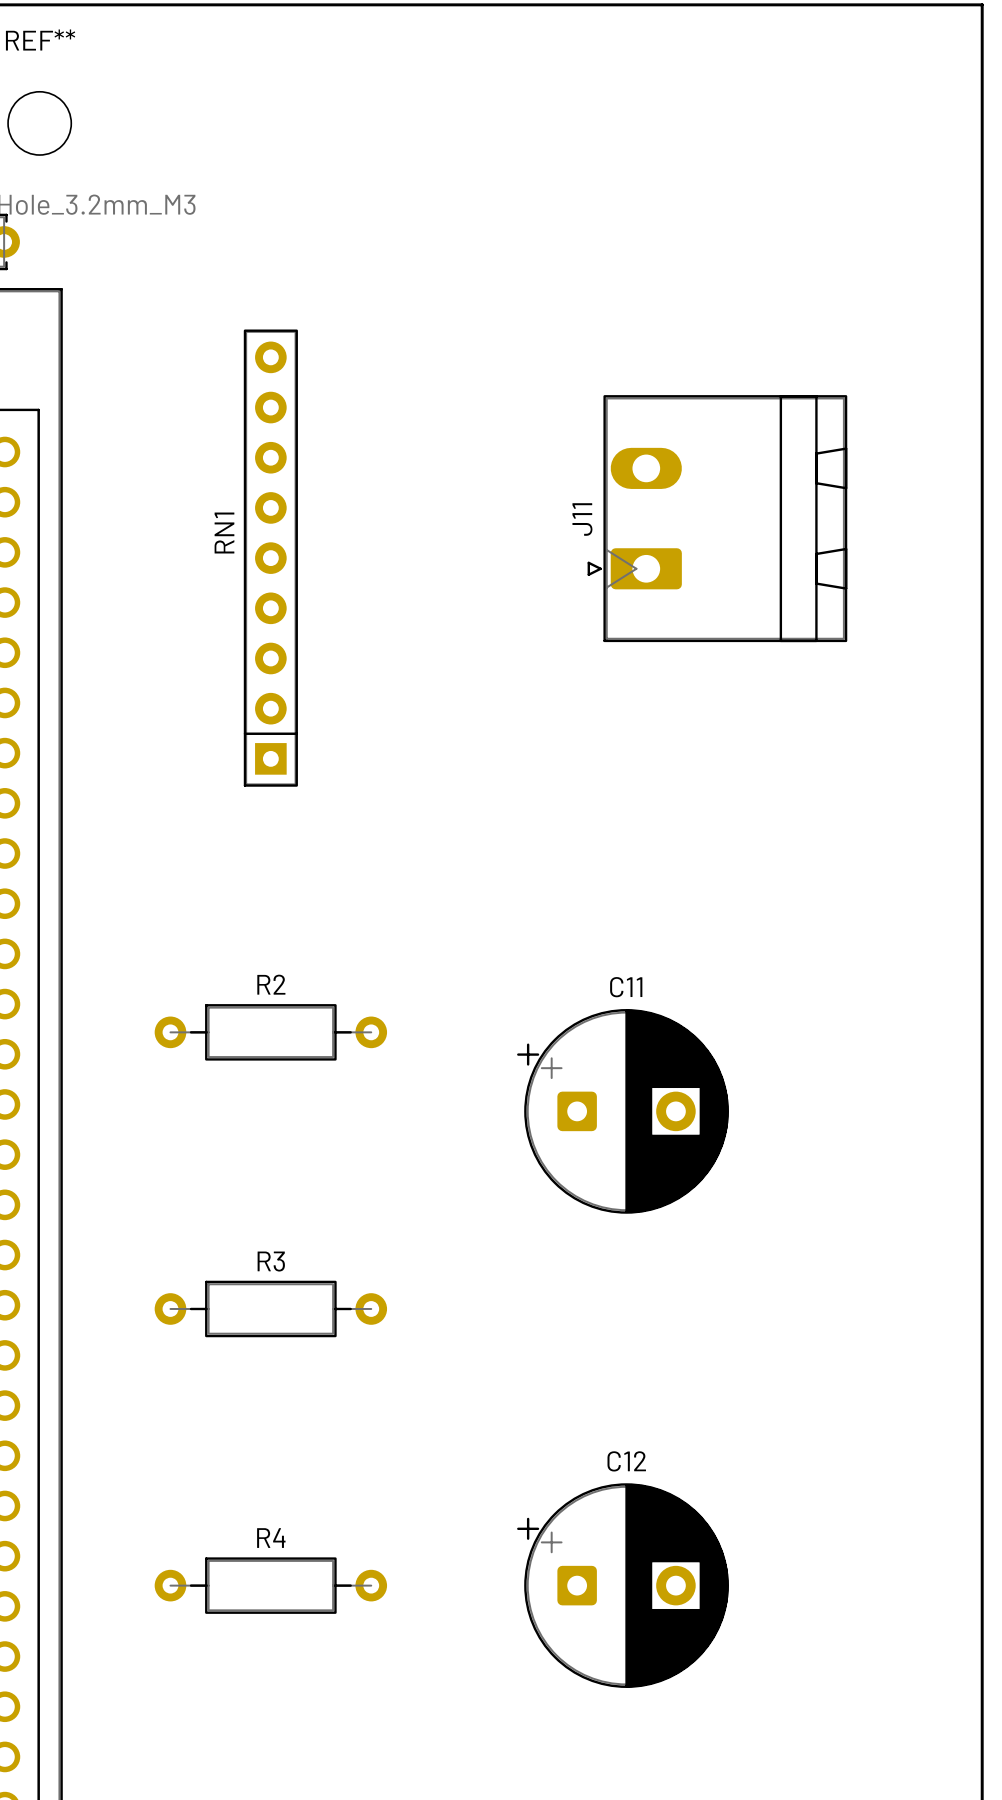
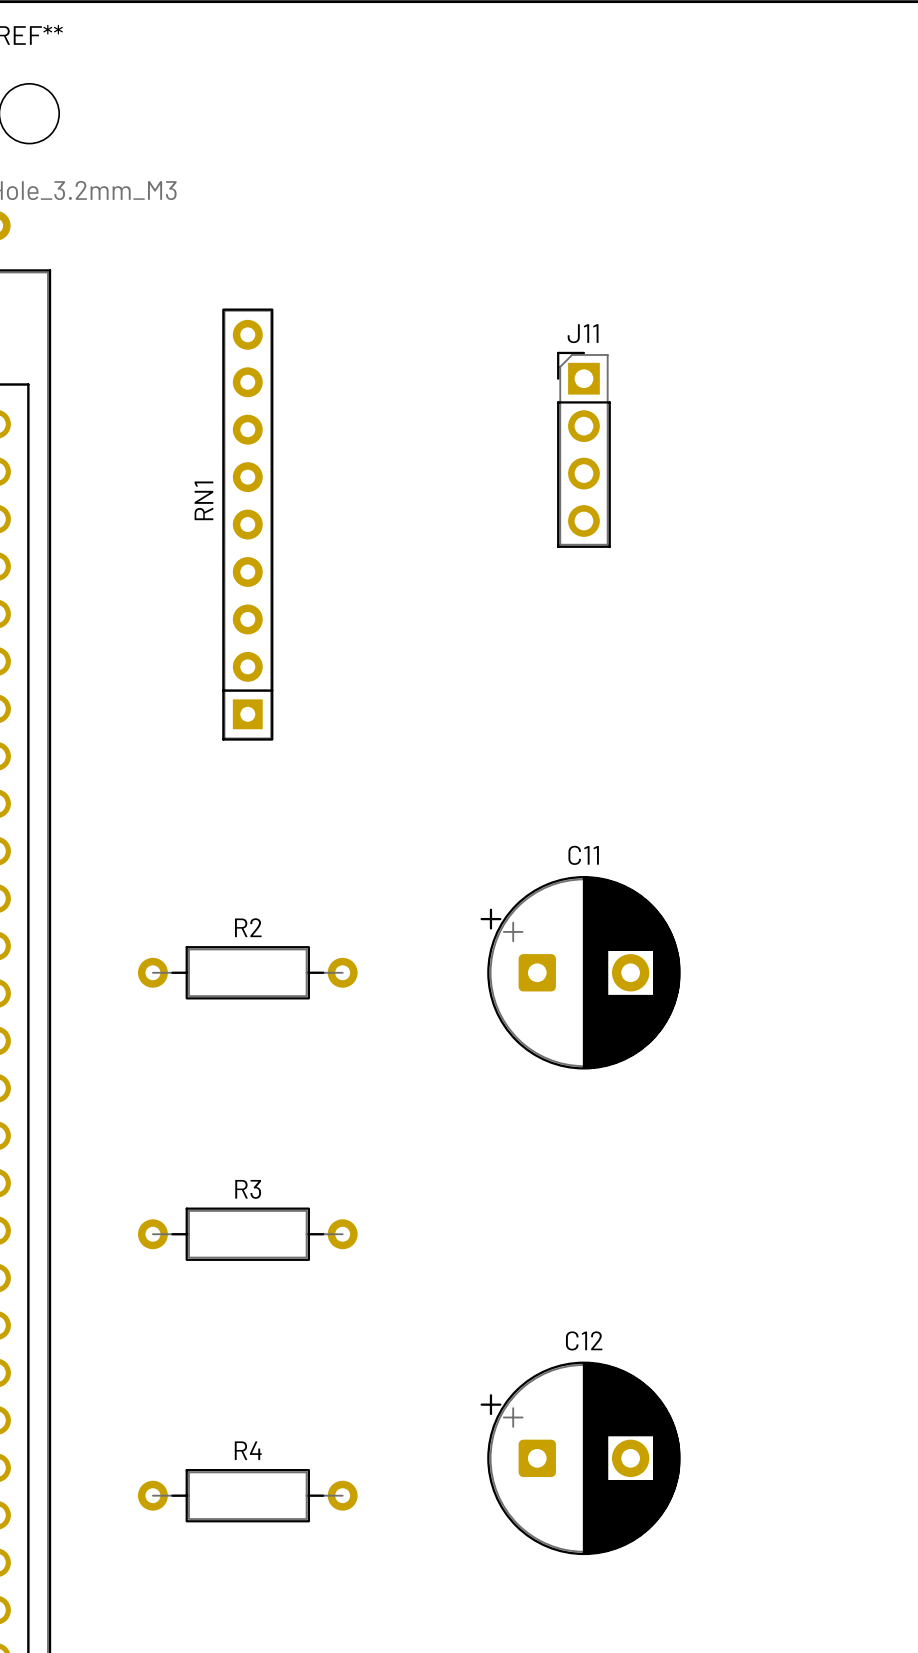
J11 footprint: [587, 395, 848, 643] -> [557, 351, 611, 548]
J11 name position: J11 (582, 519) -> J11 (583, 333)
C11 position: (622, 1111) -> (580, 972)
C12 position: (622, 1585) -> (580, 1458)

